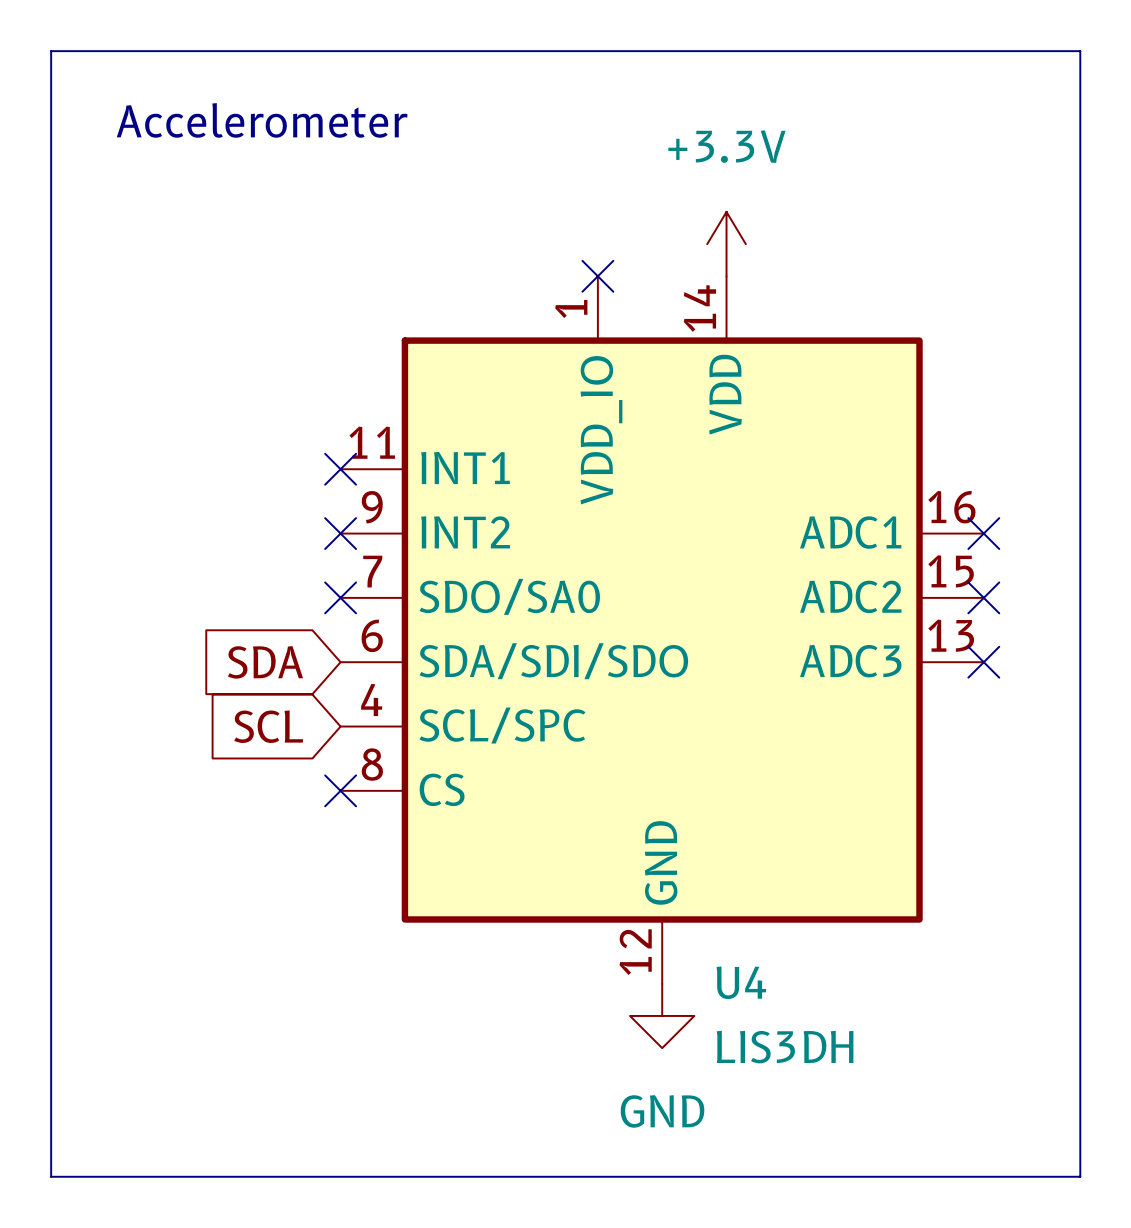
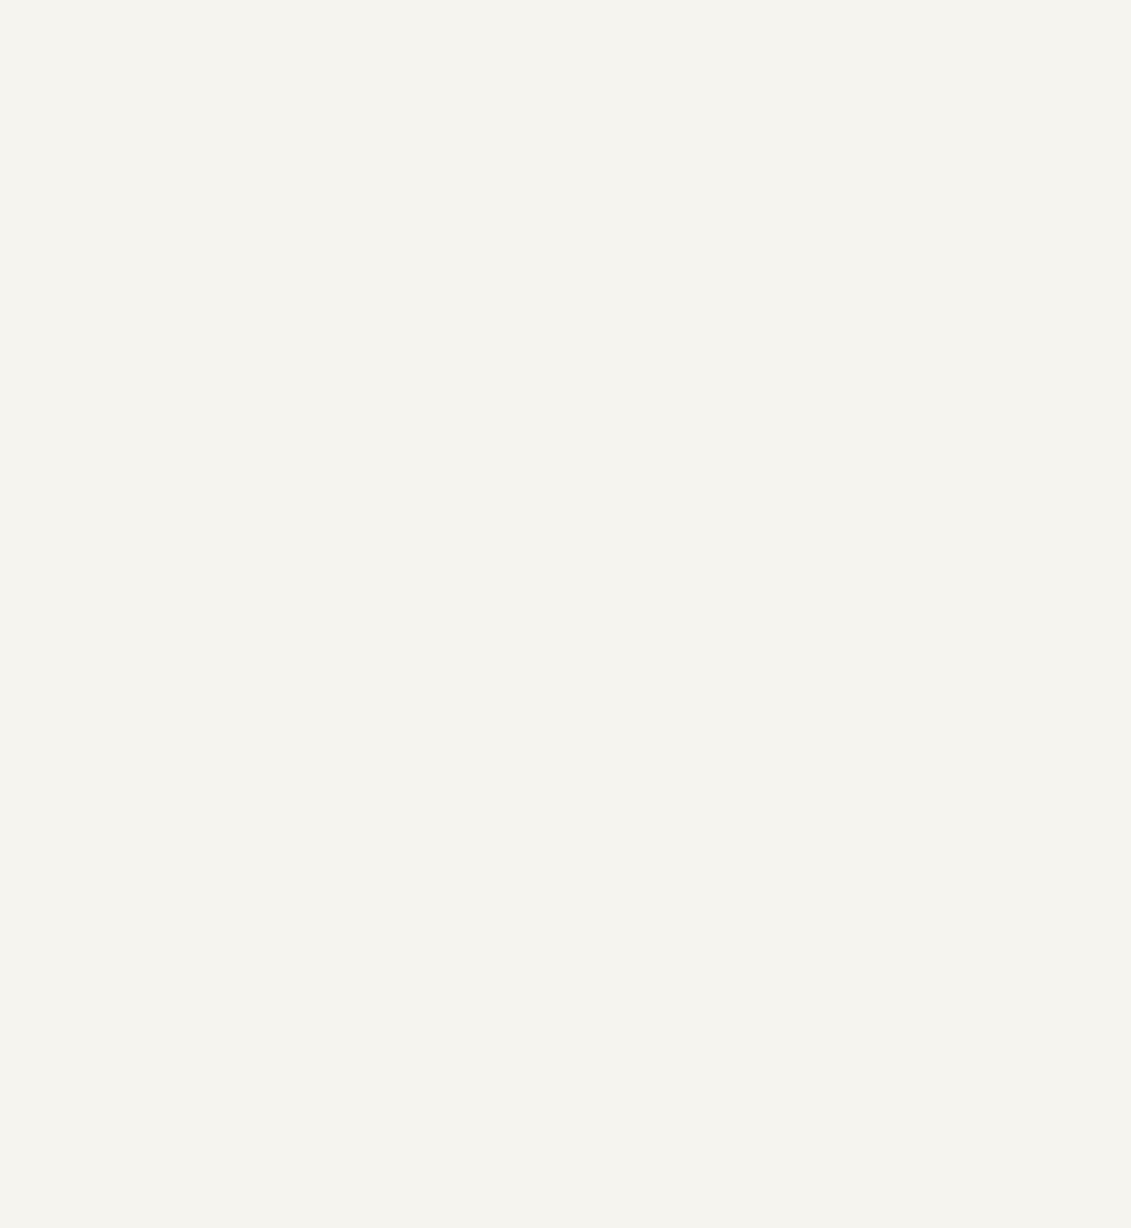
line: (51, 51) (1080, 51) (1080, 1176) (51, 1176) (51, 51) -> none
text: Accelerometer (262, 120) -> none
power symbol: +3.3V (726, 244) -> none
no-connect mark: (597, 276) -> none
no-connect mark: (340, 469) -> none
no-connect mark: (340, 533) -> none
no-connect mark: (983, 533) -> none
no-connect mark: (340, 597) -> none
no-connect mark: (983, 597) -> none
U4: LIS3DH (662, 630) -> none
global label: SDA (265, 662) -> none
no-connect mark: (983, 662) -> none
global label: SCL (268, 726) -> none
no-connect mark: (340, 790) -> none
power symbol: GND (662, 1015) -> none

